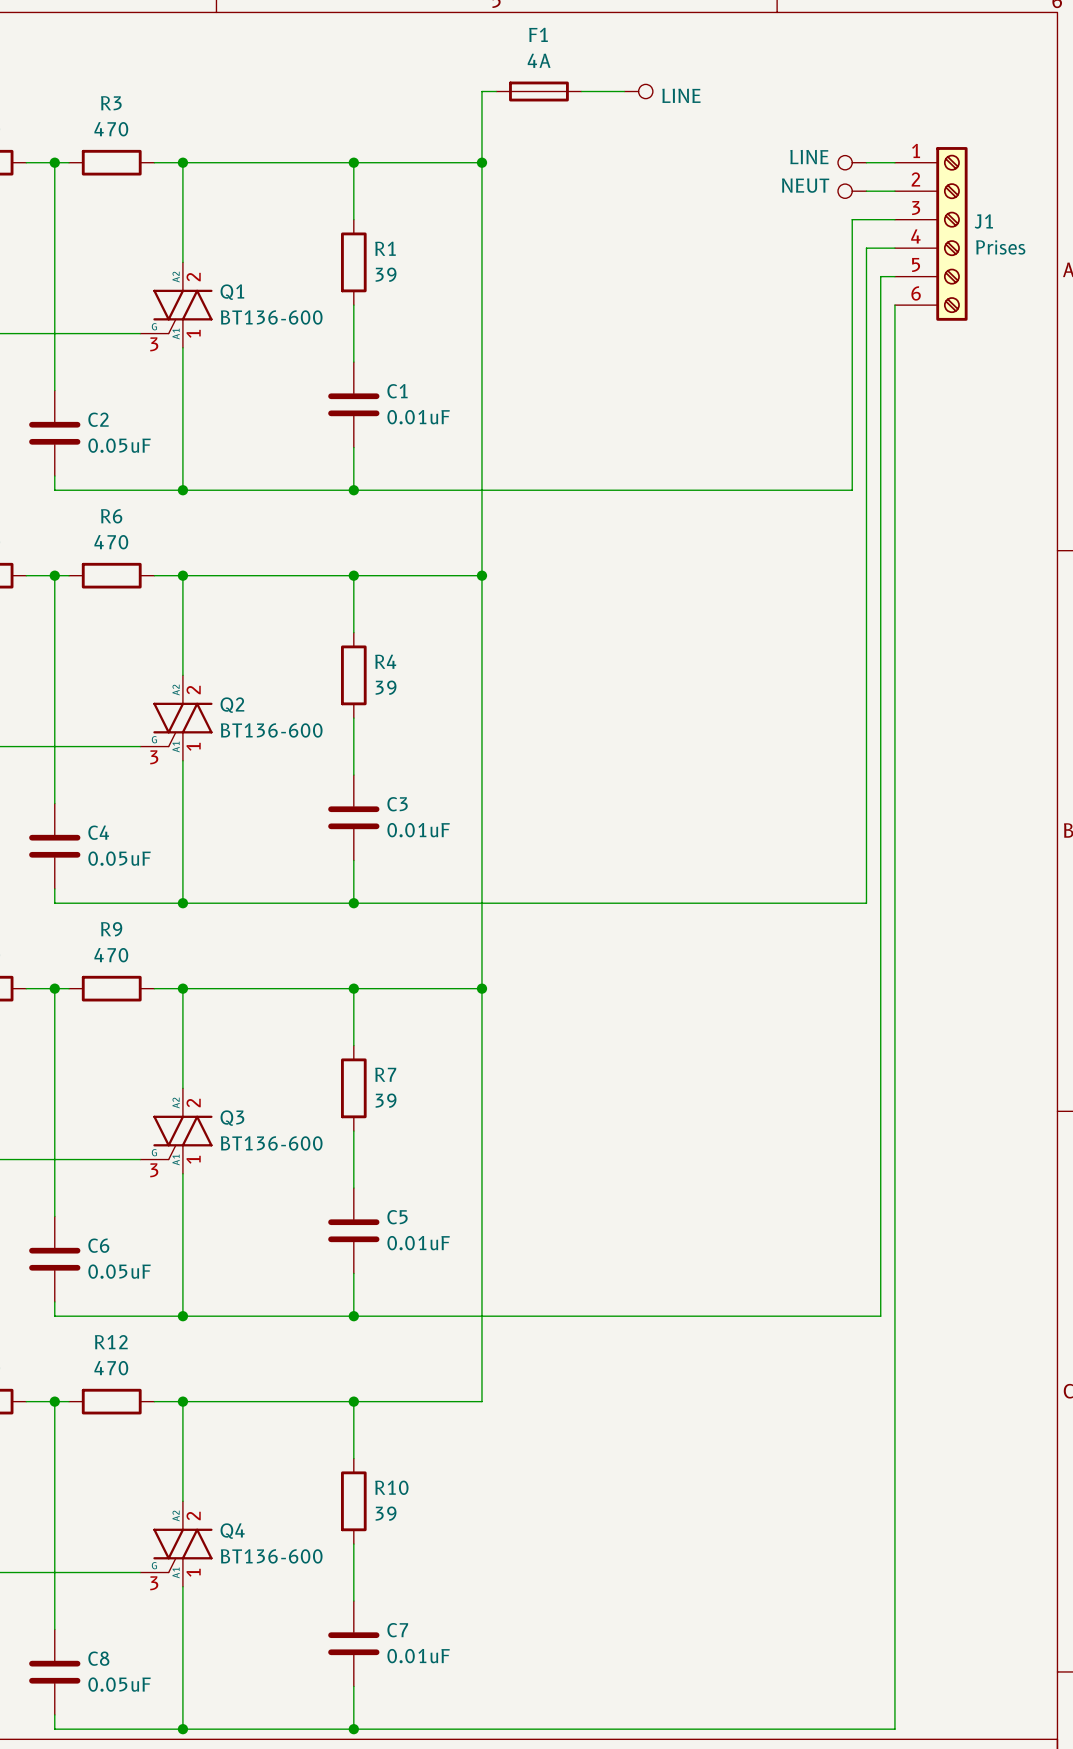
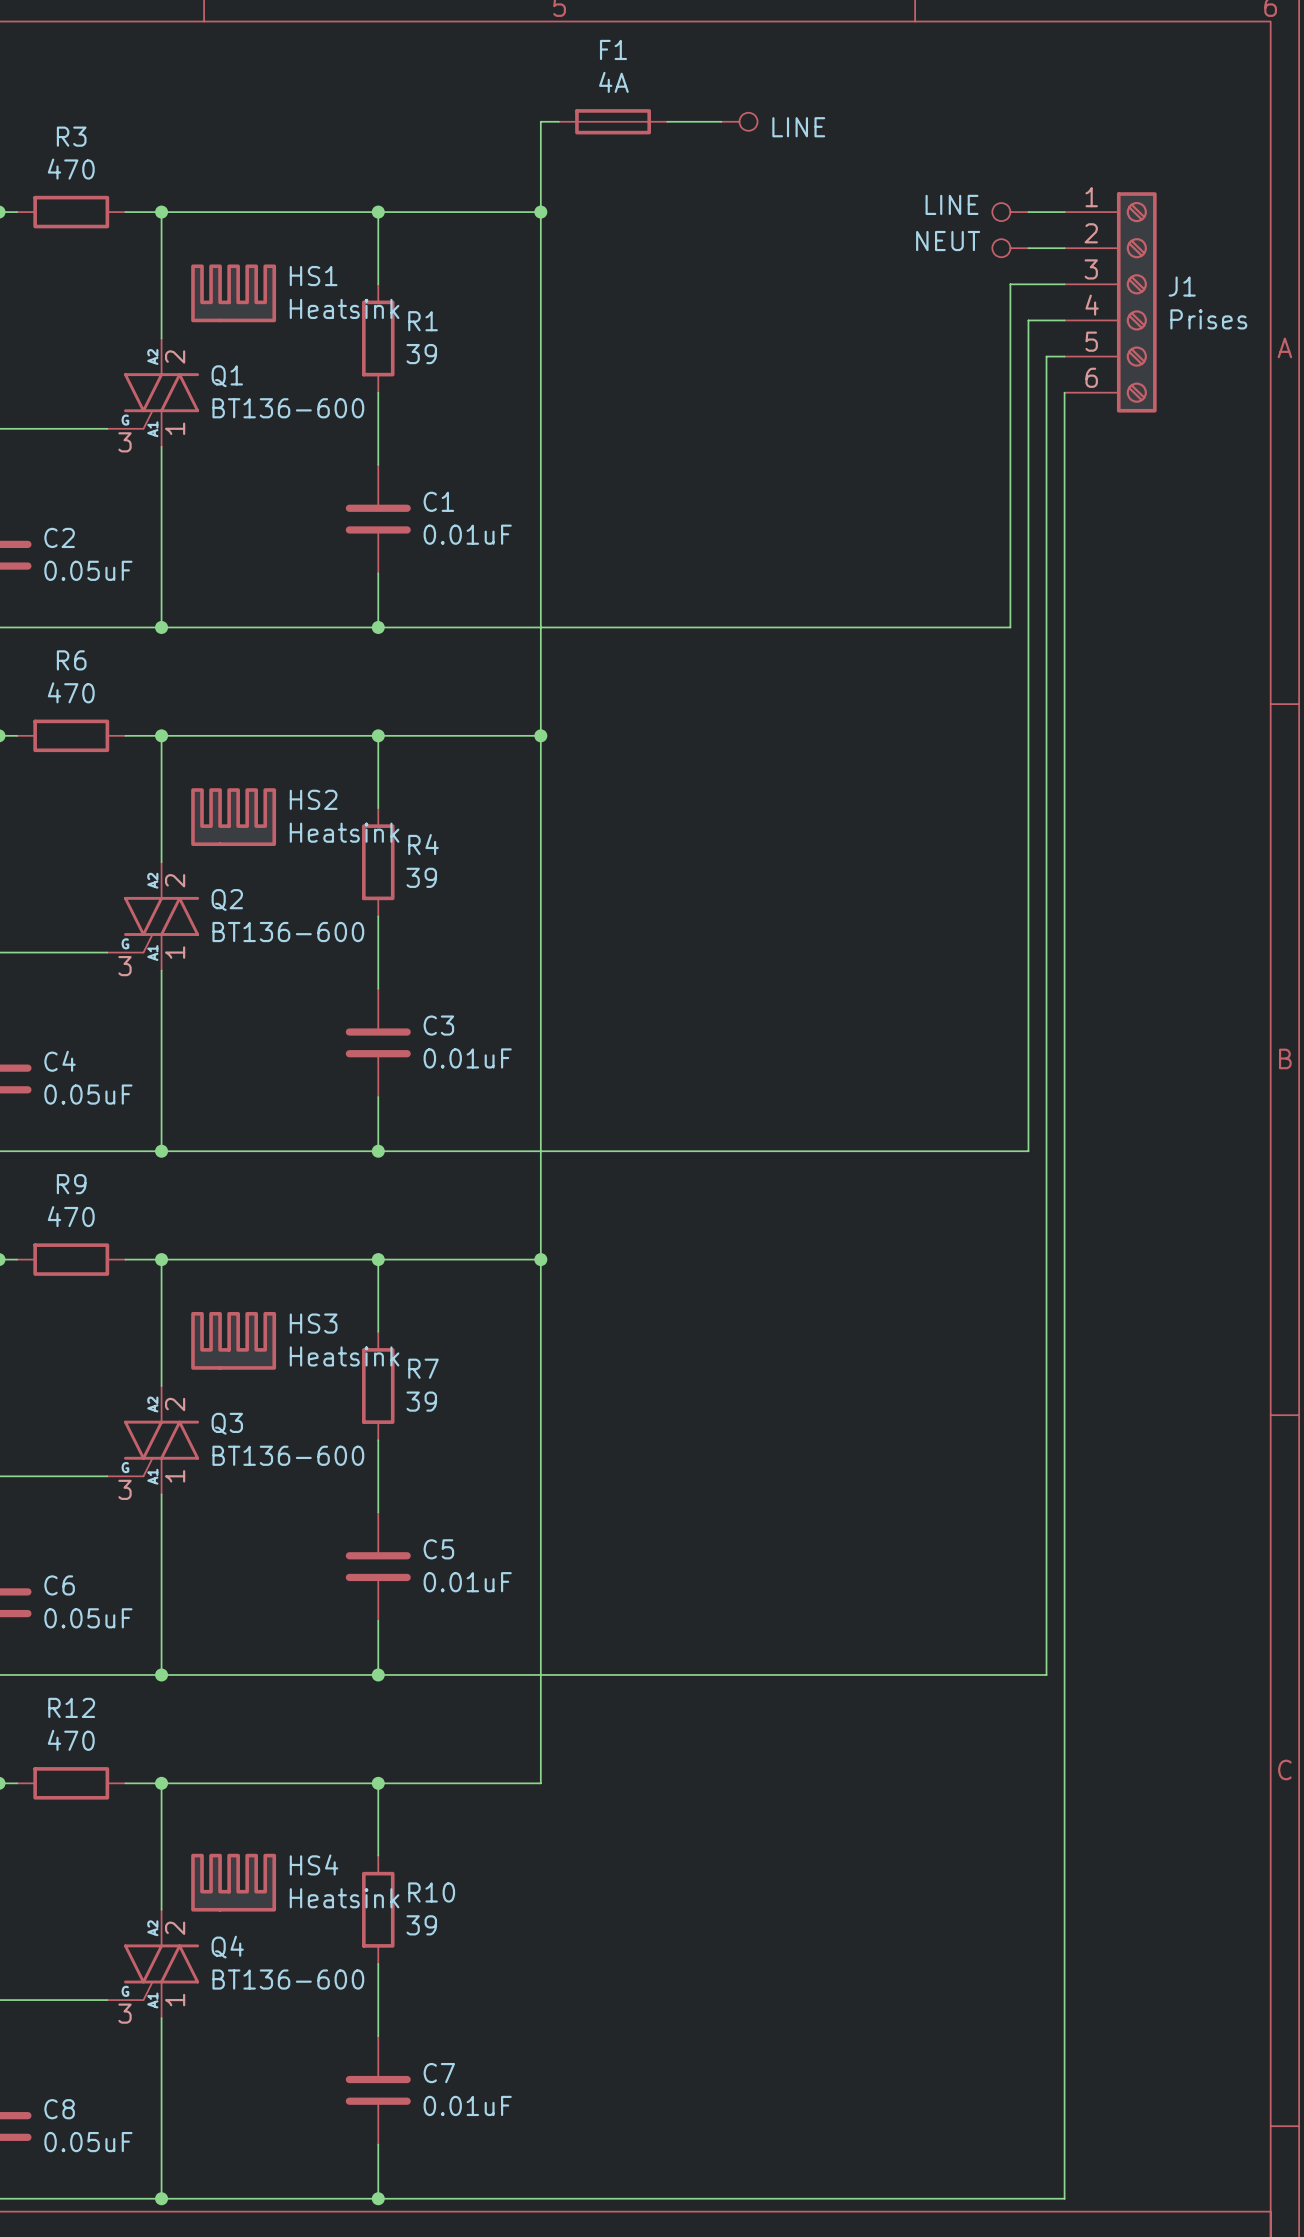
HS1: none -> Heatsink (233, 293)
HS2: none -> Heatsink (233, 817)
HS3: none -> Heatsink (233, 1340)
HS4: none -> Heatsink (233, 1882)

